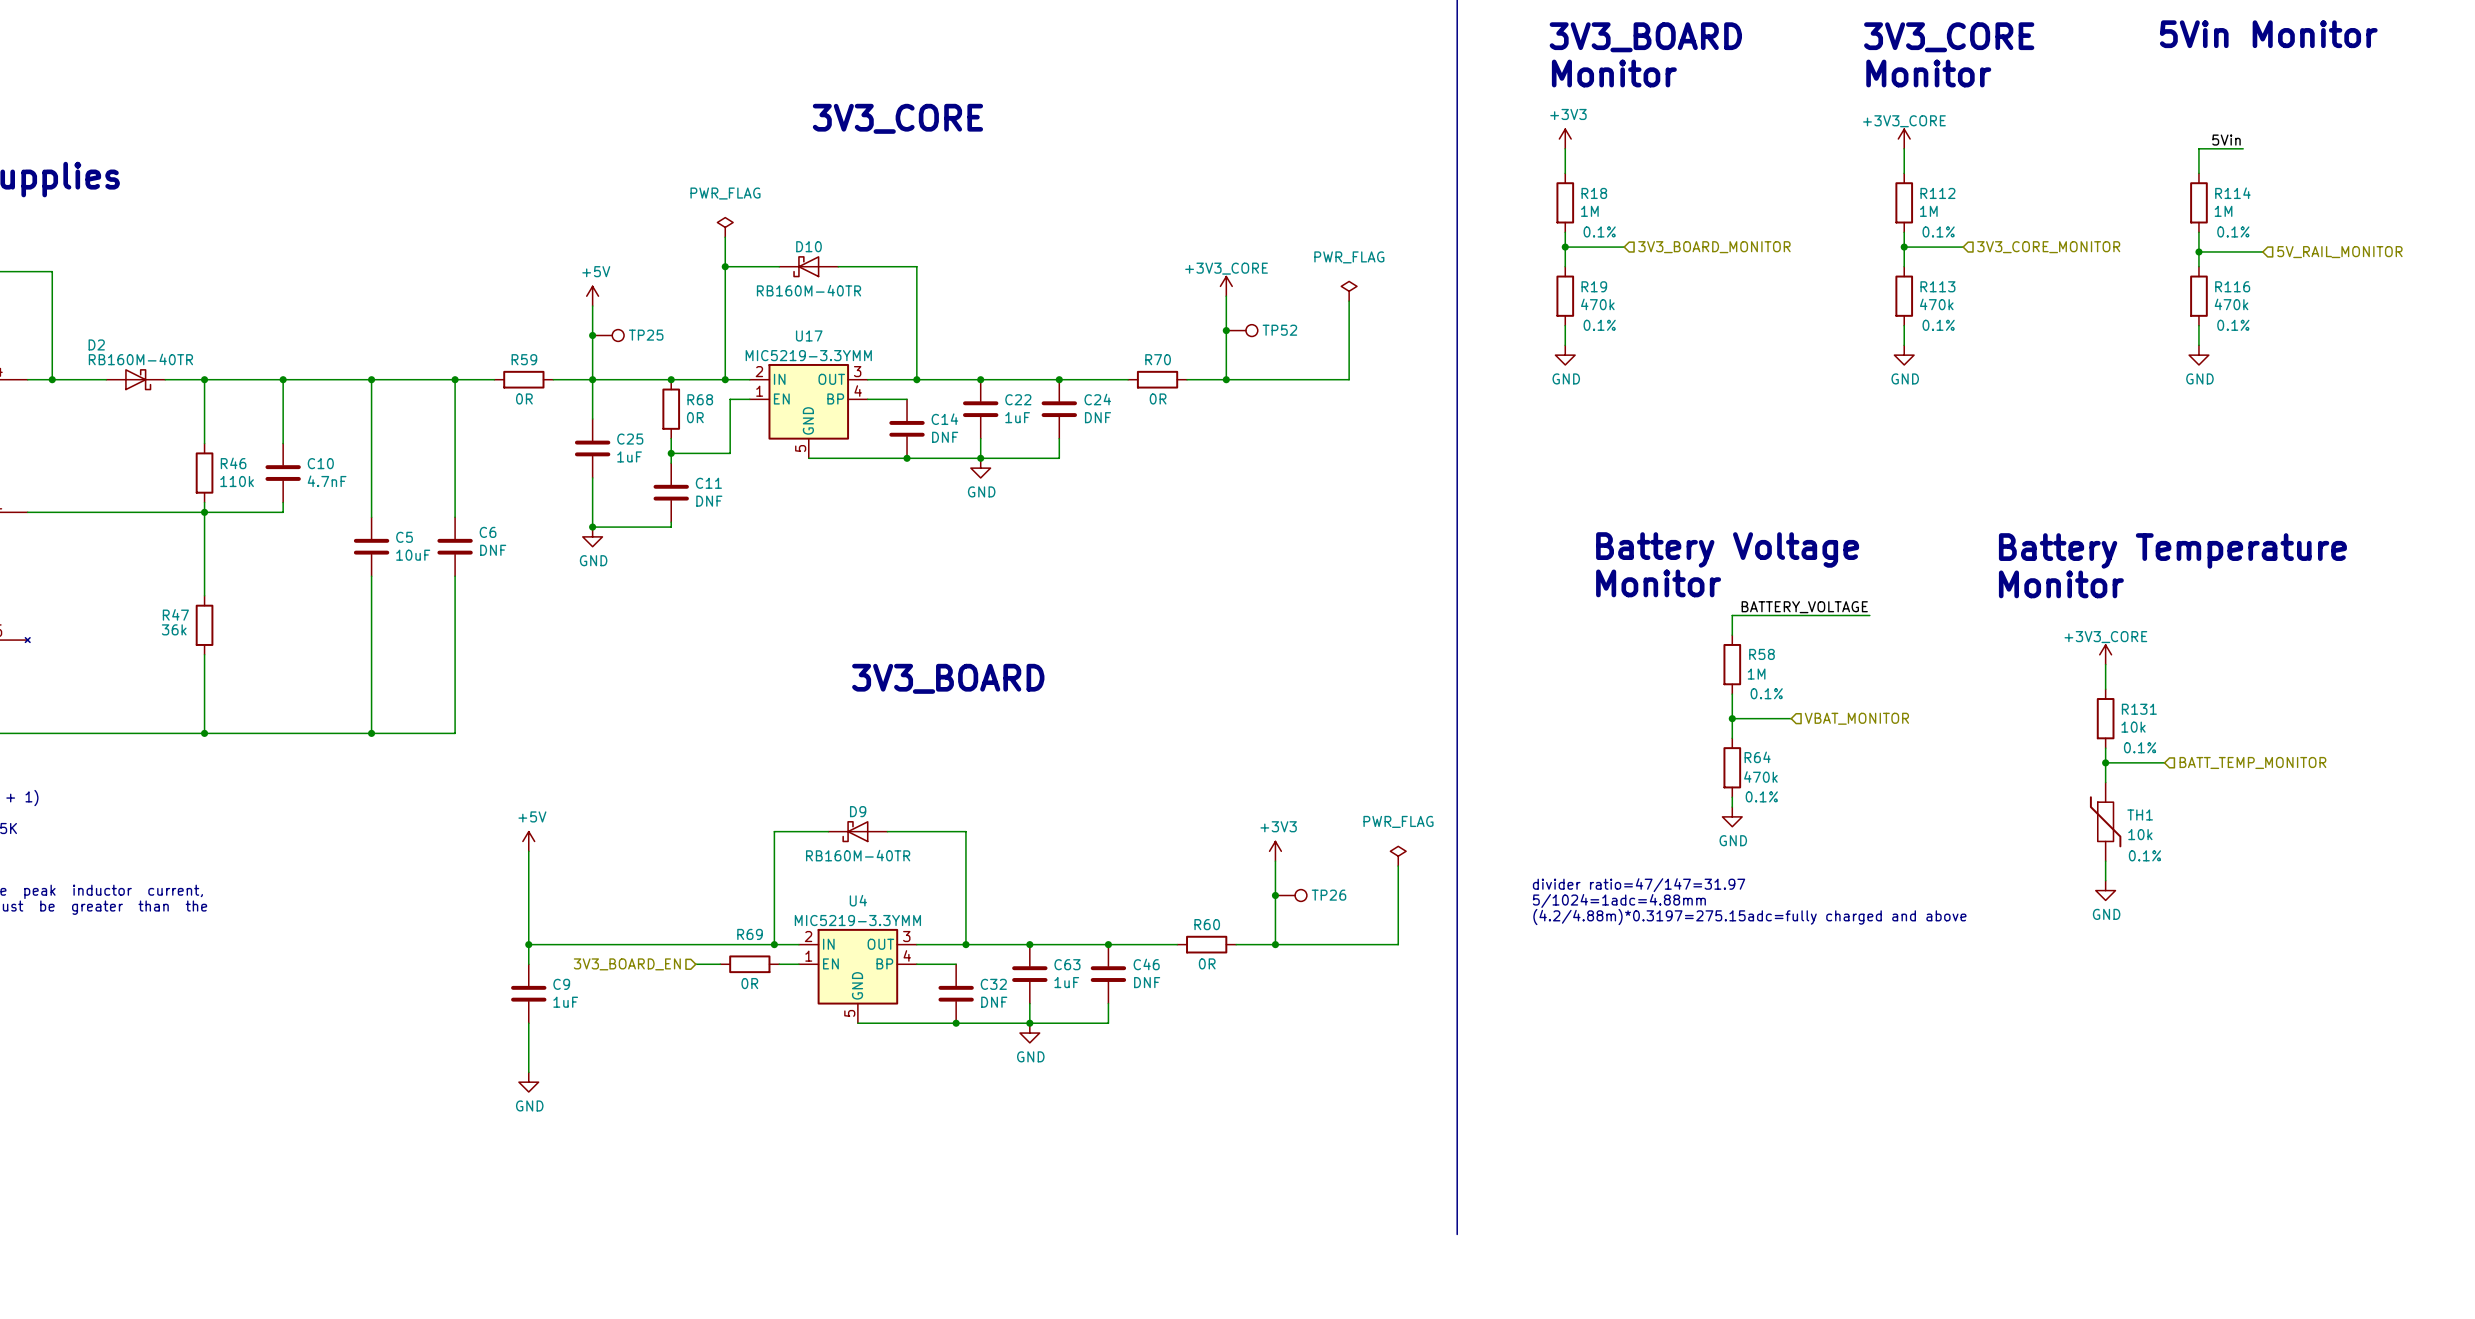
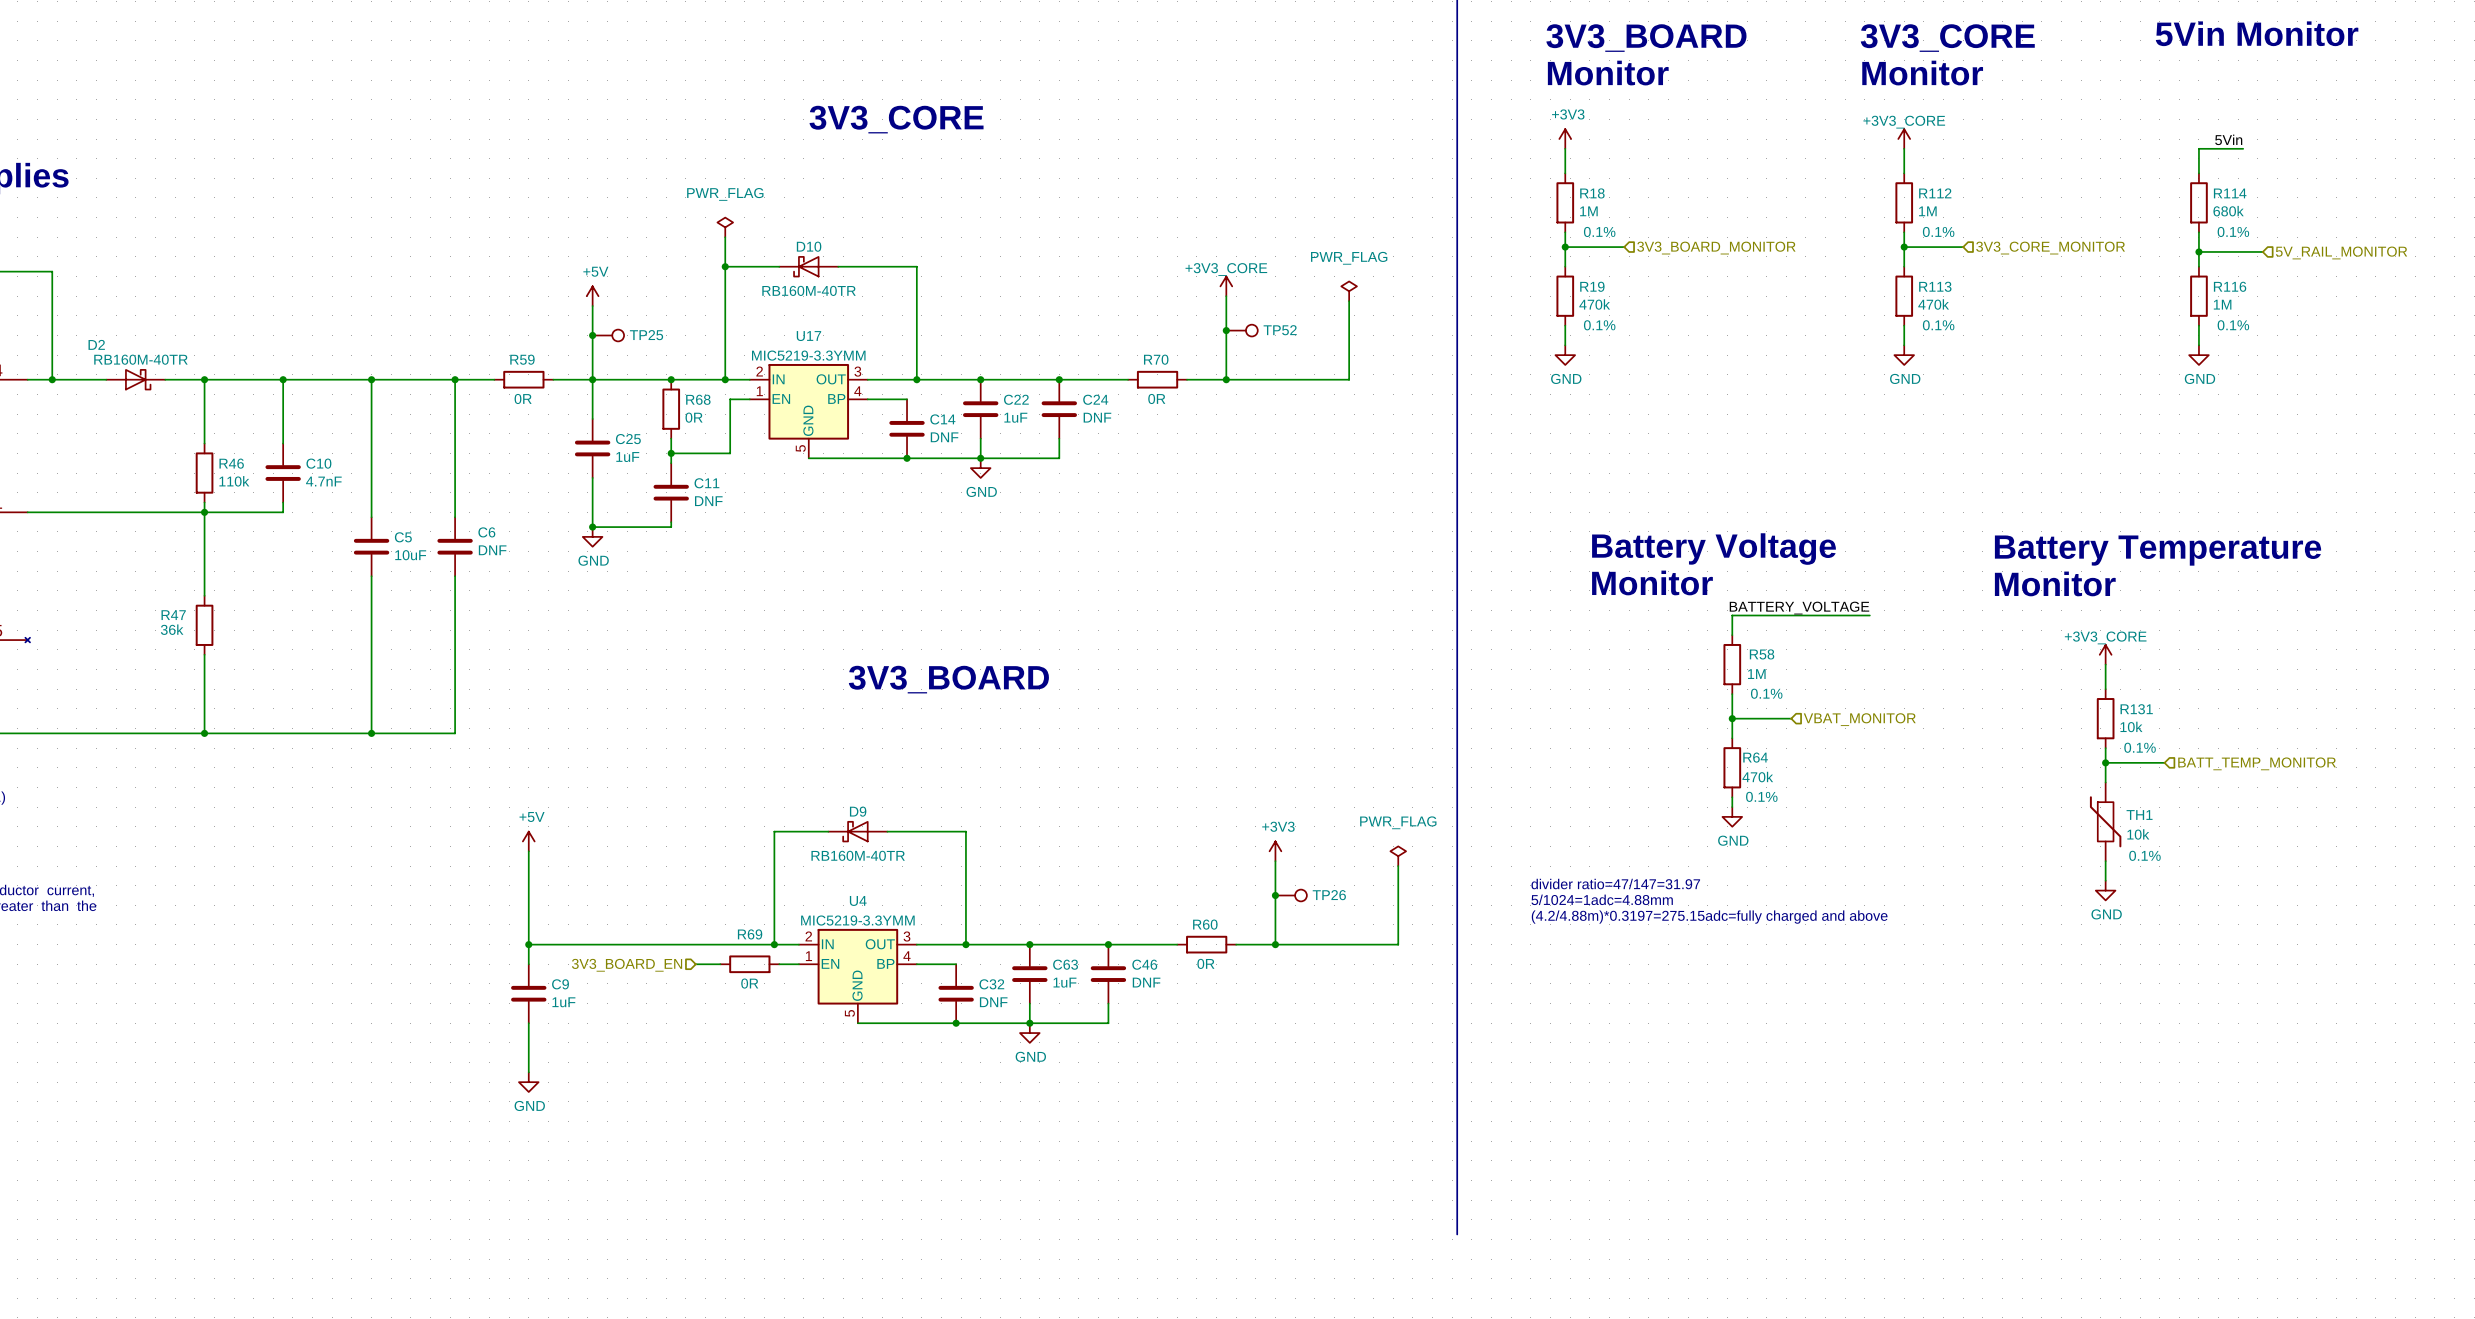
R114 value: 1M (2223, 211) -> 680k (2228, 211)
R116 value: 470k (2231, 304) -> 1M (2222, 304)

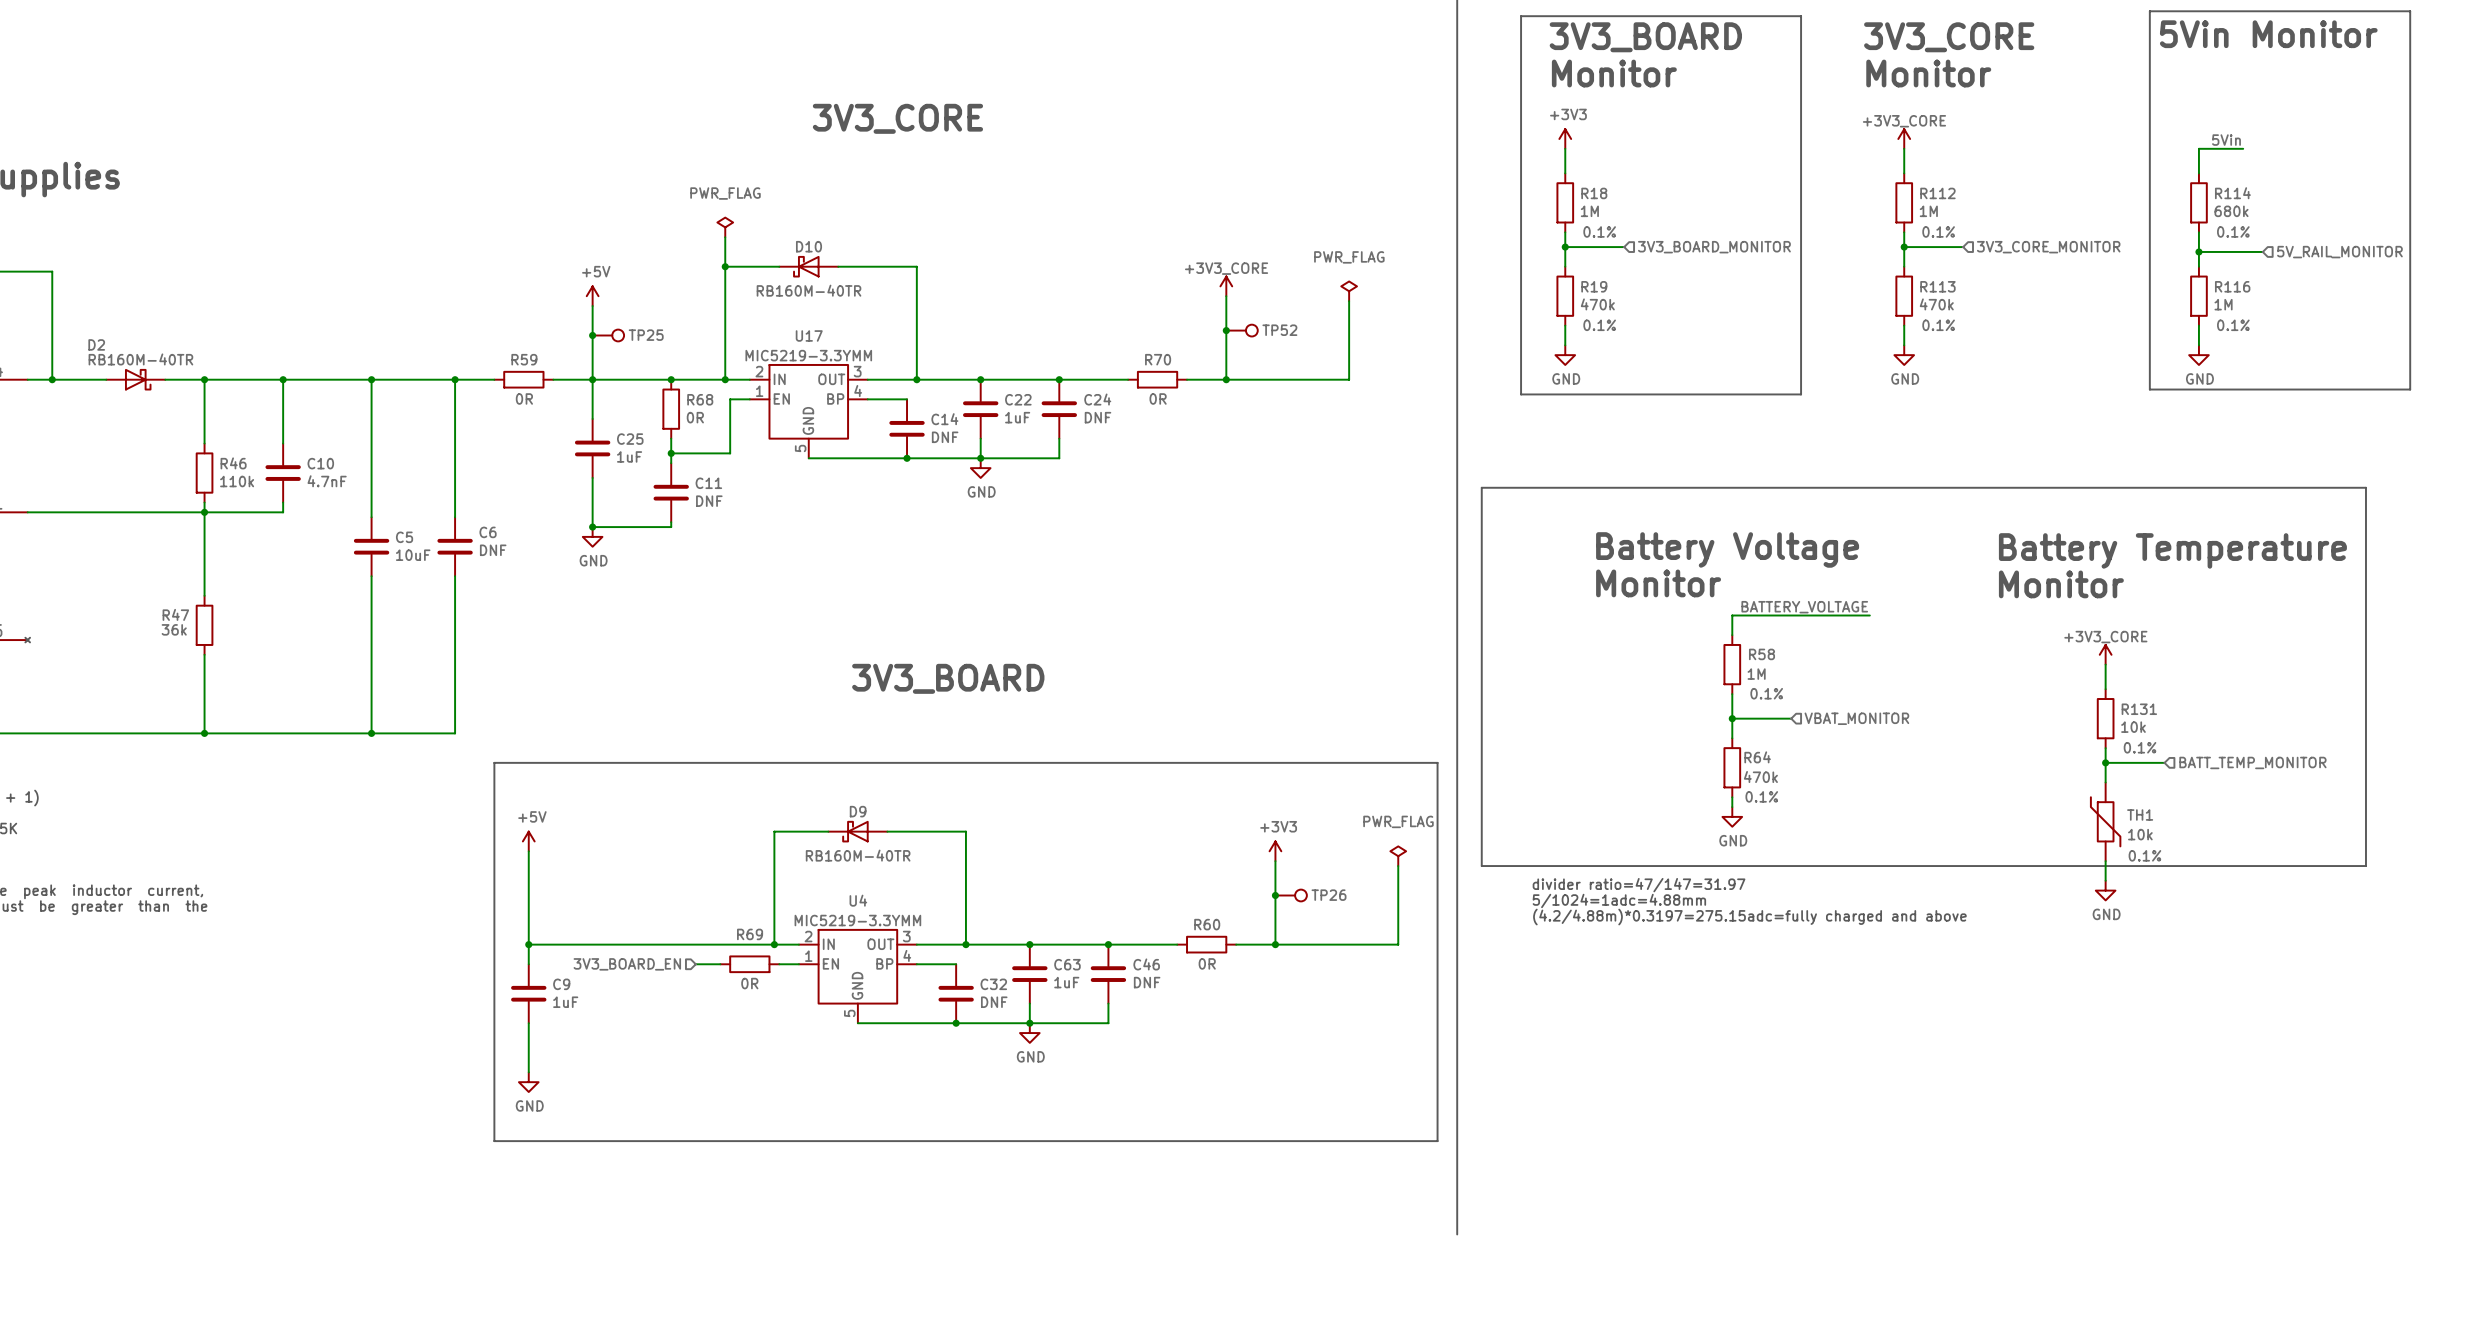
line: none -> (2149, 11) (2410, 11) (2410, 389) (2149, 389) (2149, 11)
line: none -> (1521, 16) (1801, 16) (1801, 394) (1521, 394) (1521, 16)
line: none -> (1481, 487) (2365, 487) (2365, 866) (1481, 866) (1481, 487)
line: none -> (494, 762) (1437, 762) (1437, 1141) (494, 1141) (494, 762)

